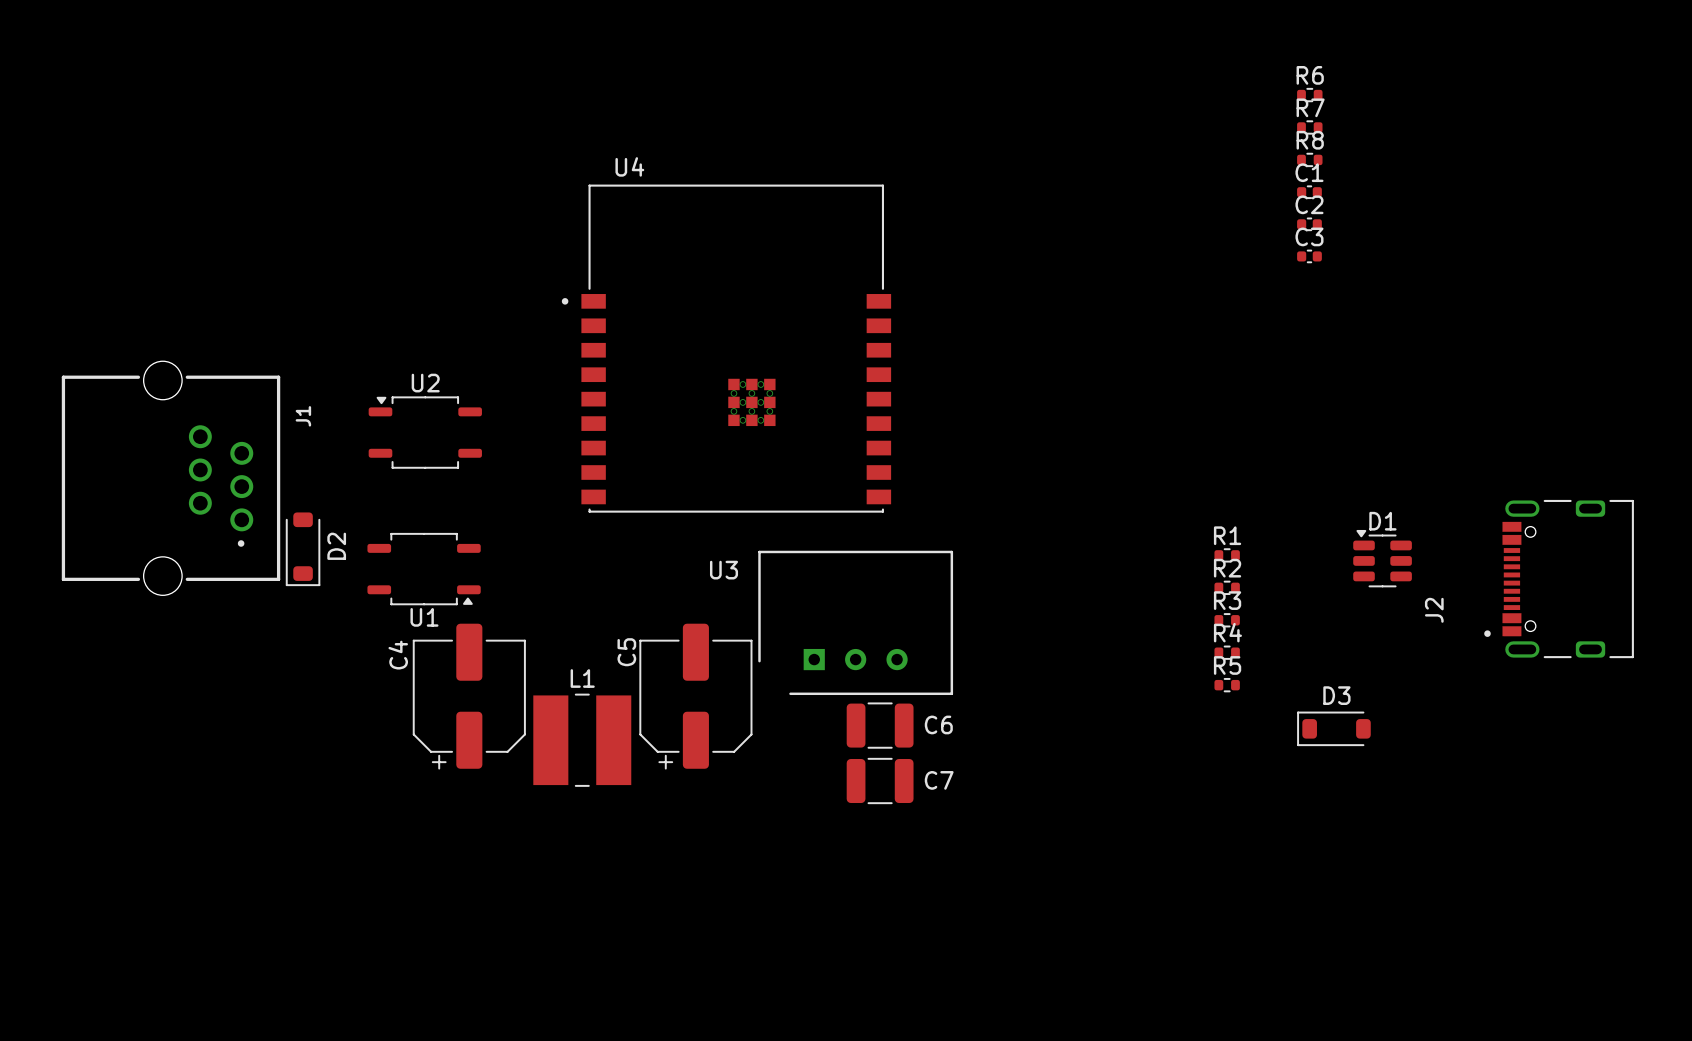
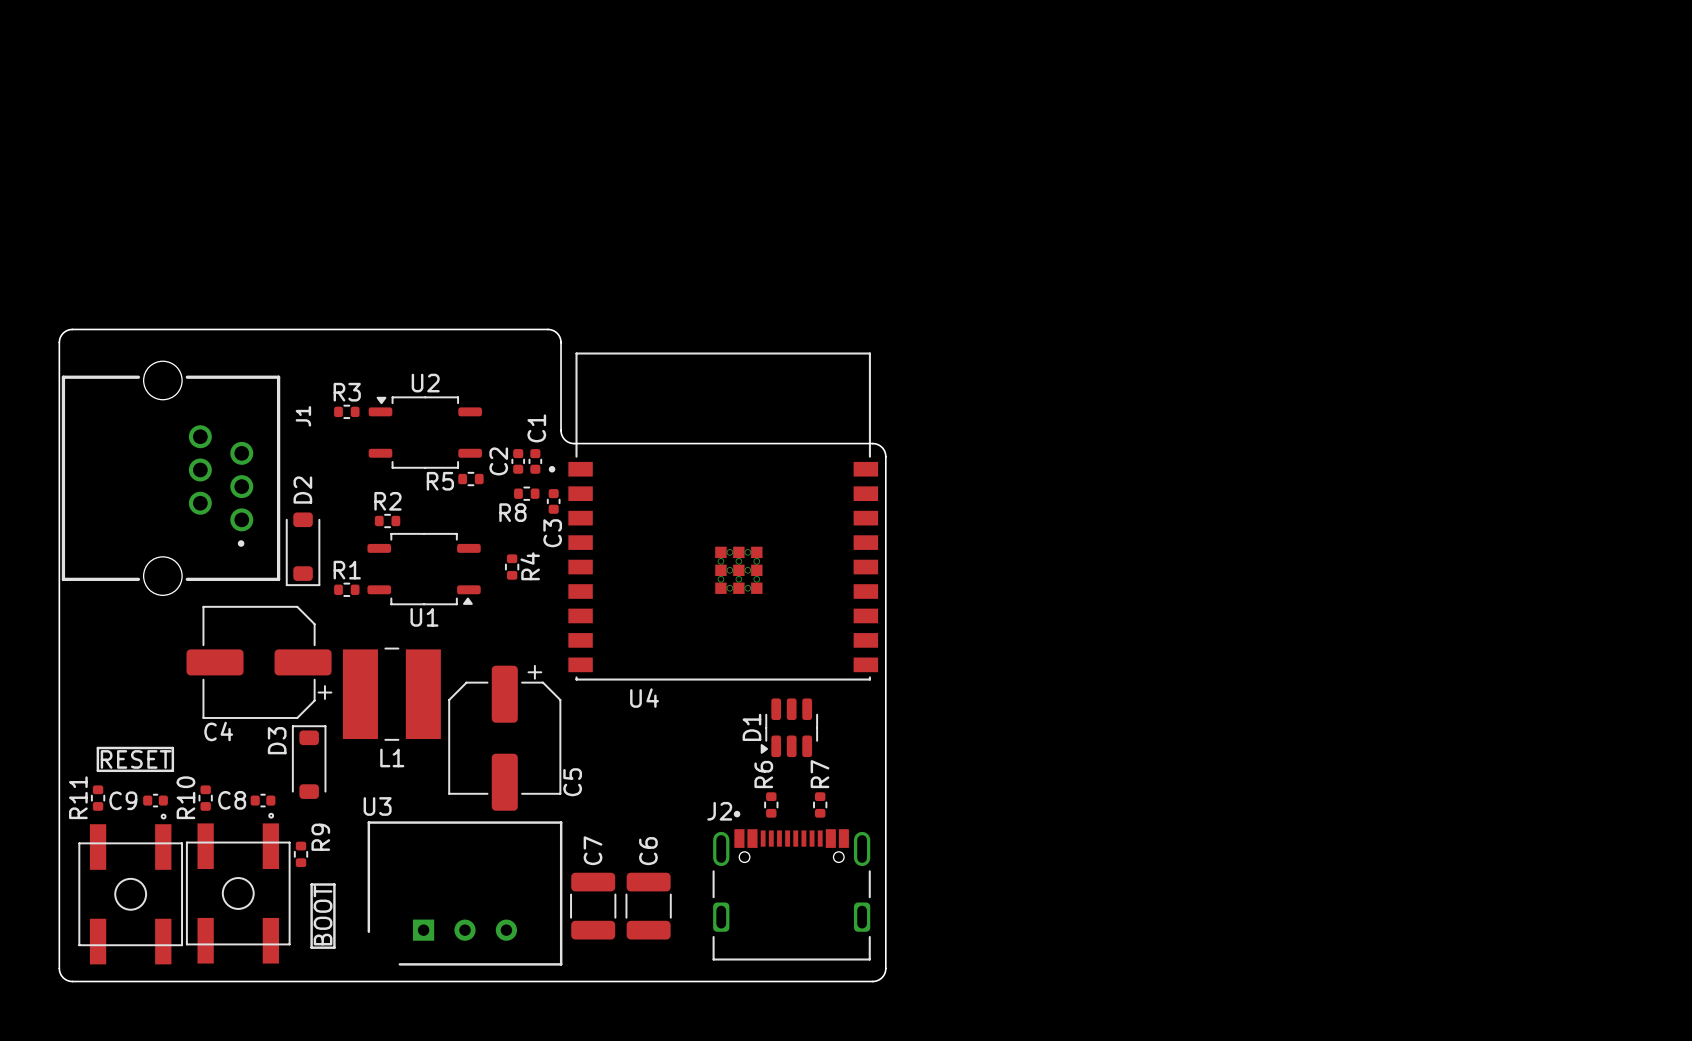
R6 rotation: 0° (1309, 95) -> 90° clockwise (771, 804)
R6 position: (1309, 95) -> (771, 804)
R7 rotation: 0° (1309, 127) -> 90° clockwise (820, 804)
R7 position: (1309, 127) -> (820, 804)
R8 name position: R8 (1310, 140) -> R8 (512, 512)
R8 position: (1309, 159) -> (526, 493)
U4 name position: U4 (629, 166) -> U4 (644, 698)
C1 rotation: 0° (1309, 192) -> 90° clockwise (535, 461)
C1 position: (1309, 192) -> (535, 461)
C2 rotation: 0° (1309, 224) -> 90° clockwise (518, 461)
C2 position: (1309, 224) -> (518, 461)
C3 name position: C3 (1309, 236) -> C3 (552, 533)
C3 rotation: 0° (1309, 256) -> 90° clockwise (553, 501)
C3 position: (1309, 256) -> (553, 501)
board edge: none -> (72, 329) (549, 329) (557, 333) (560, 340) (561, 432) (563, 438) (569, 442) (872, 443) (880, 446) (885, 456) (885, 968) (883, 976) (872, 981) (72, 981) (64, 978) (59, 968) (59, 342) (63, 333) (72, 329)
U4 position: (726, 348) -> (713, 516)
D2 name position: D2 (336, 546) -> D2 (302, 490)
R1 position: (1227, 555) -> (346, 589)
D1 rotation: 0° (1382, 558) -> 90° counterclockwise (789, 727)
D1 position: (1382, 558) -> (789, 727)
U3 name position: U3 (724, 570) -> U3 (377, 806)
J2 rotation: 0° (1559, 579) -> 90° clockwise (791, 885)
J2 position: (1559, 579) -> (791, 885)
R2 position: (1227, 587) -> (387, 521)
J2 name position: J2 (1434, 610) -> J2 (719, 811)
R3 position: (1227, 620) -> (346, 411)
U3 position: (855, 622) -> (465, 893)
R4 rotation: 0° (1227, 652) -> 90° clockwise (512, 567)
R4 position: (1227, 652) -> (512, 567)
R5 name position: R5 (1227, 665) -> R5 (440, 481)
L1 name position: L1 (582, 678) -> L1 (392, 757)
R5 position: (1227, 685) -> (470, 479)
D3 name position: D3 (1336, 695) -> D3 (277, 740)
C4 rotation: 0° (469, 696) -> 90° counterclockwise (259, 662)
C4 position: (469, 696) -> (259, 662)
C5 rotation: 0° (695, 696) -> 180° (504, 737)
C5 position: (695, 696) -> (504, 737)
C6 name position: C6 (938, 724) -> C6 (648, 851)
C6 rotation: 0° (880, 725) -> 90° clockwise (648, 906)
C6 position: (880, 725) -> (648, 906)
D3 rotation: 0° (1333, 728) -> 90° clockwise (309, 762)
D3 position: (1333, 728) -> (309, 762)
L1 position: (582, 740) -> (391, 694)
line: none -> (97, 747) (172, 747) (172, 770) (97, 770) (97, 747)
text: none -> RESET (136, 759)
C7 name position: C7 (939, 780) -> C7 (593, 850)
C7 rotation: 0° (880, 781) -> 90° clockwise (593, 906)
C7 position: (880, 781) -> (593, 906)
R11: none -> (98, 798)
R10: none -> (205, 798)
C9: none -> (155, 800)
C8: none -> (263, 800)
R9: none -> (301, 854)
line: none -> (311, 884) (334, 884) (334, 947) (311, 947) (311, 884)
part: none -> (238, 888)
part: none -> (130, 889)
text: none -> BOOT (323, 915)

